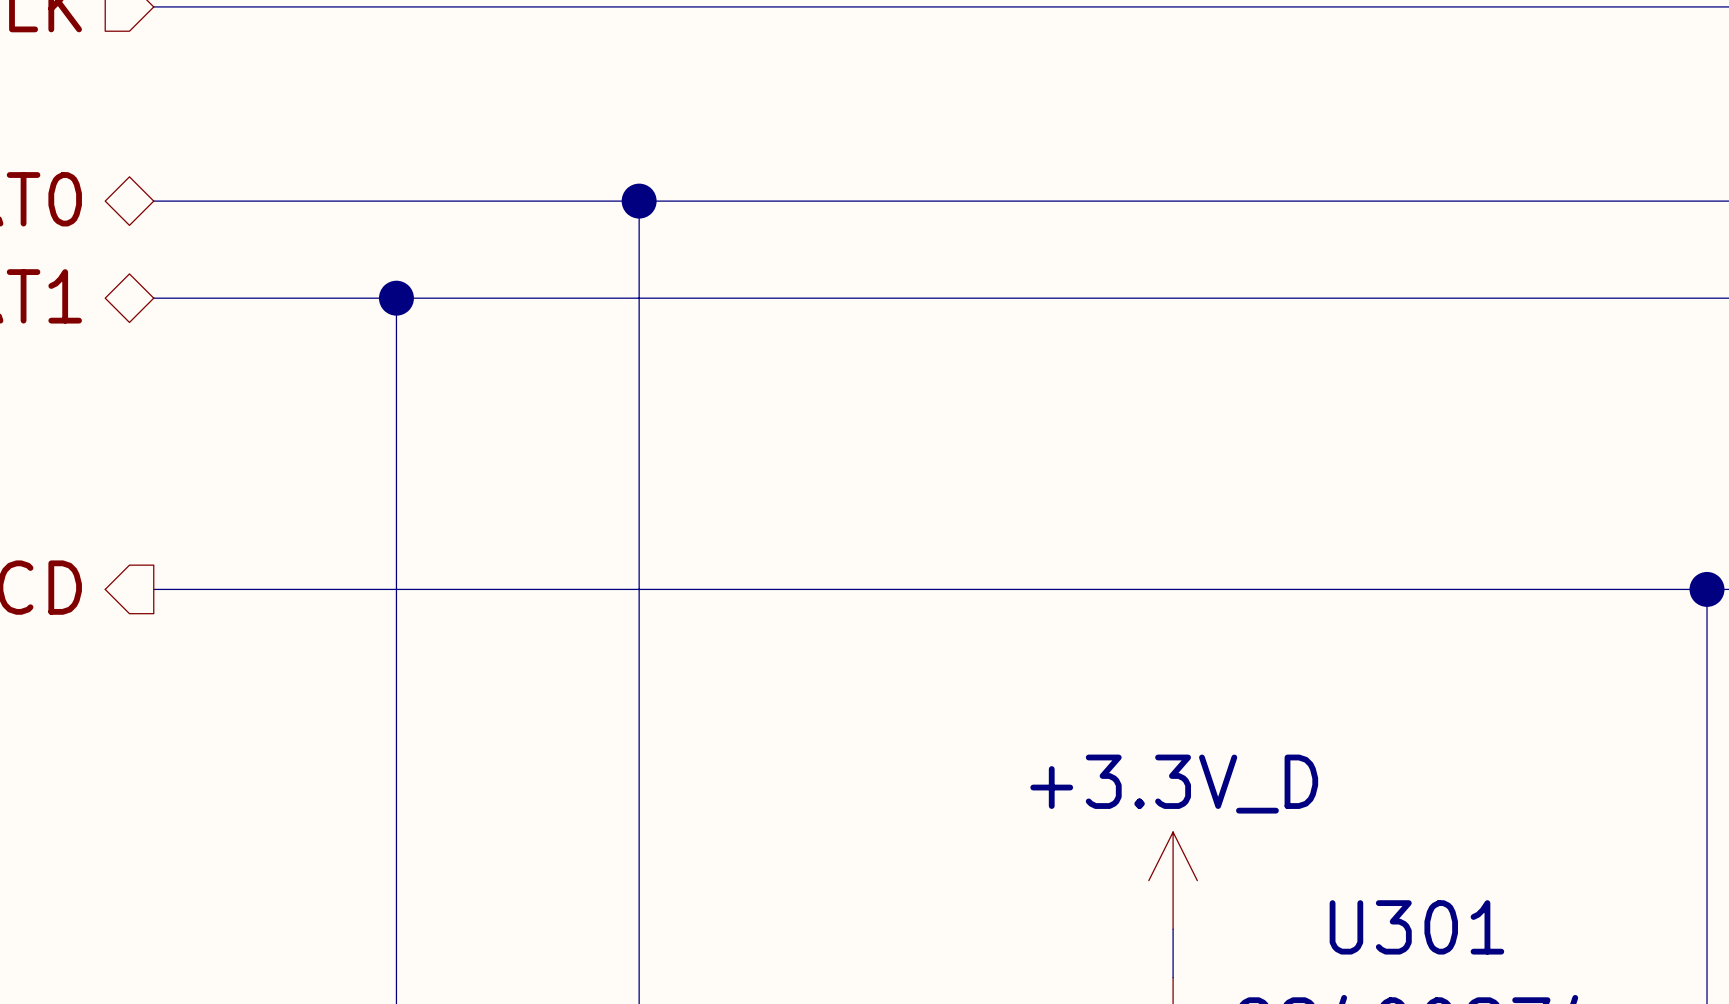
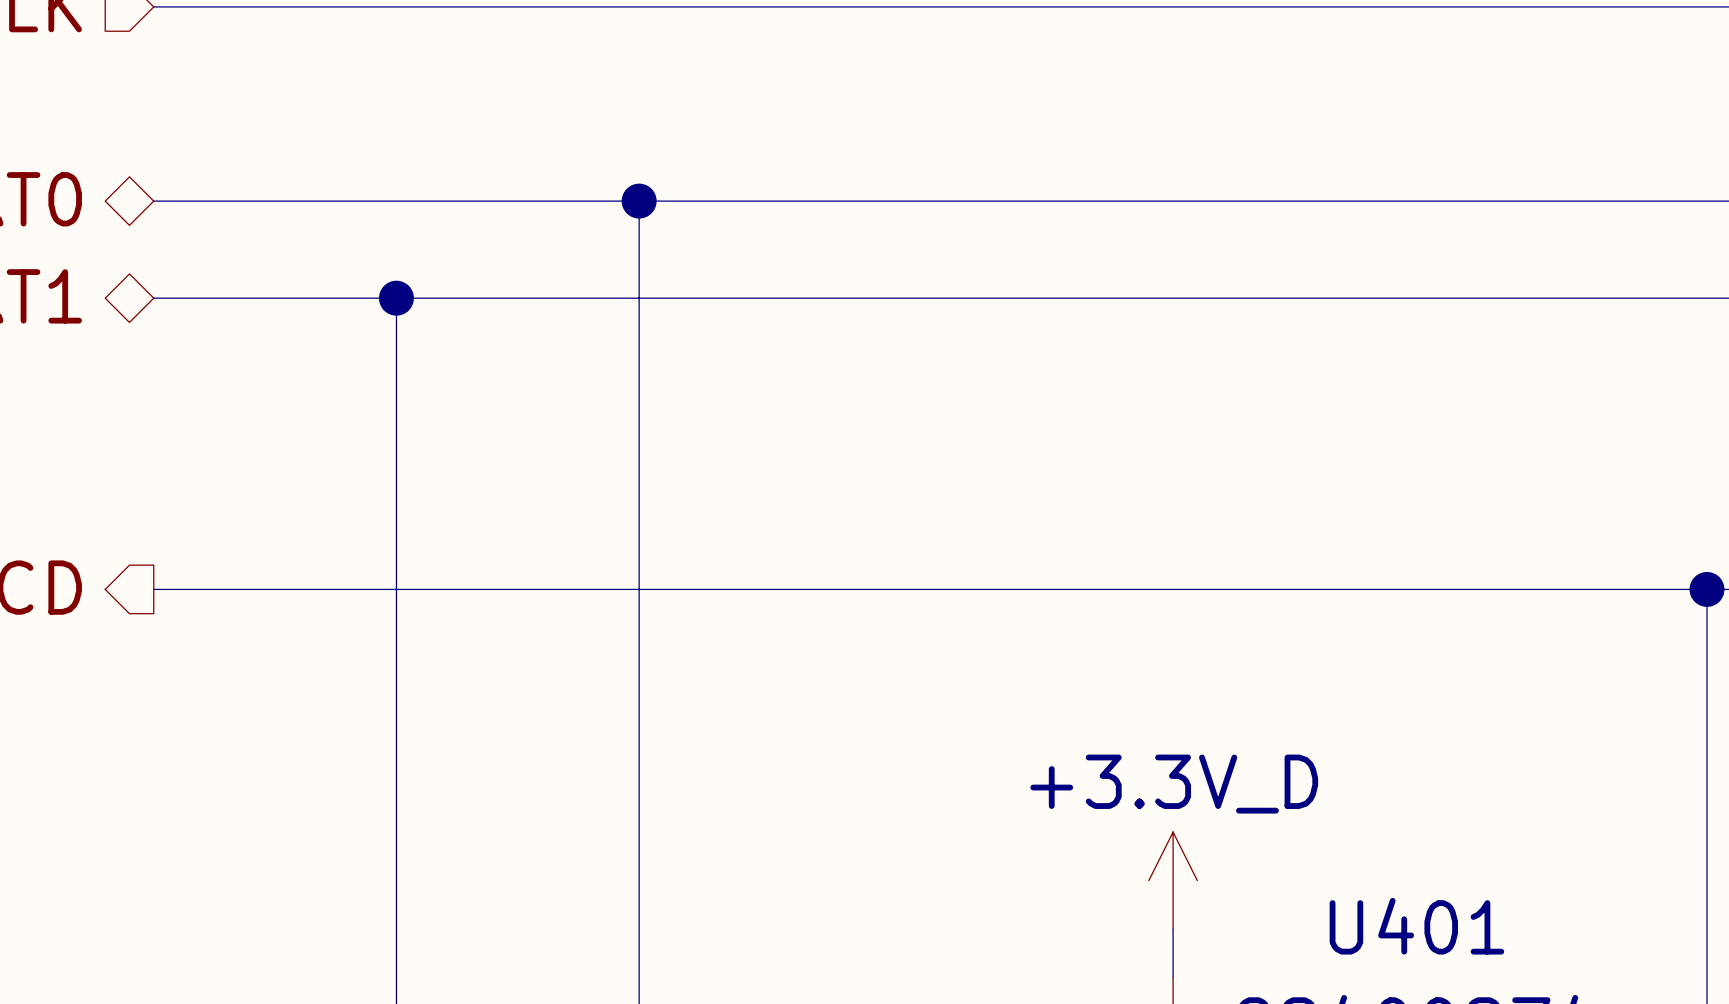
U301 name: U301 (1416, 927) -> U401 (1416, 926)

